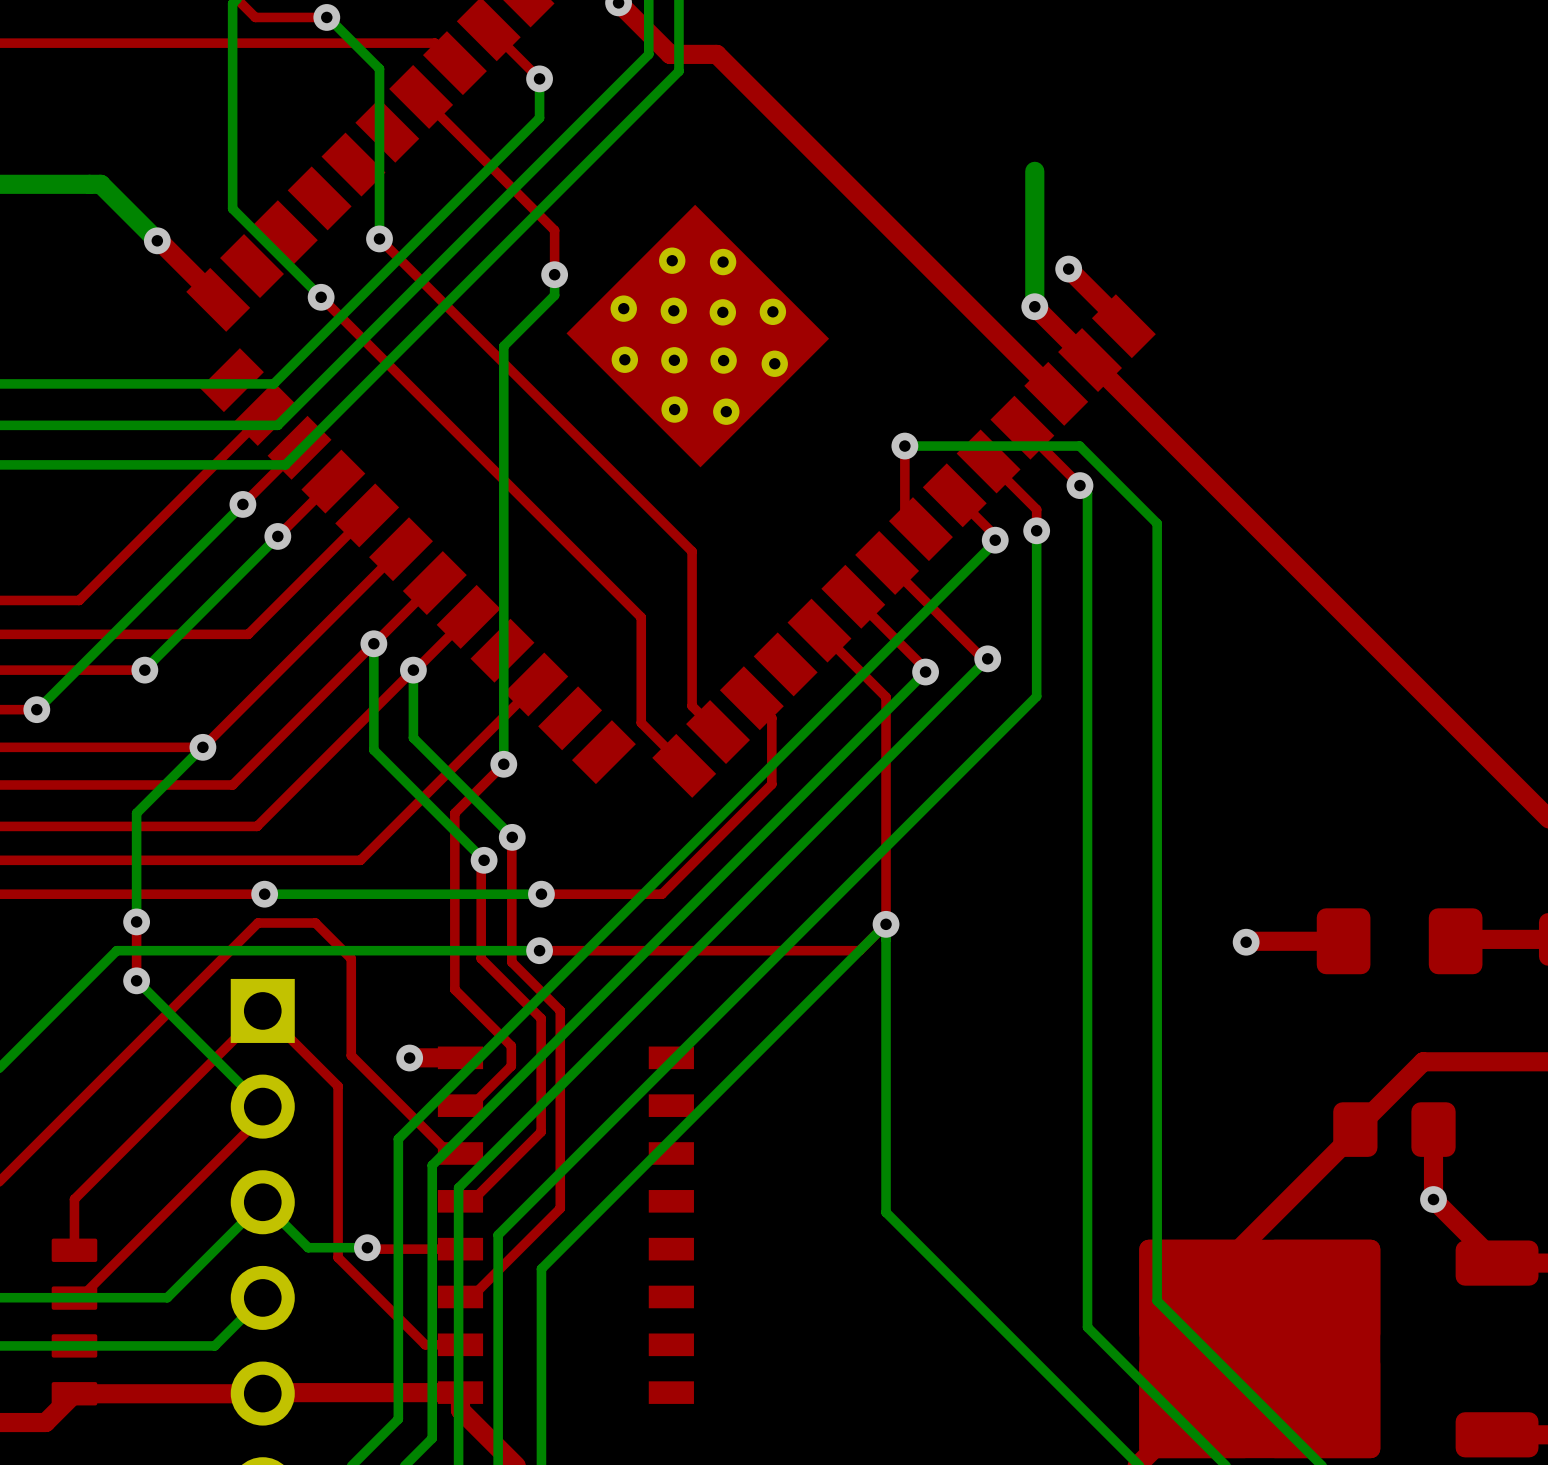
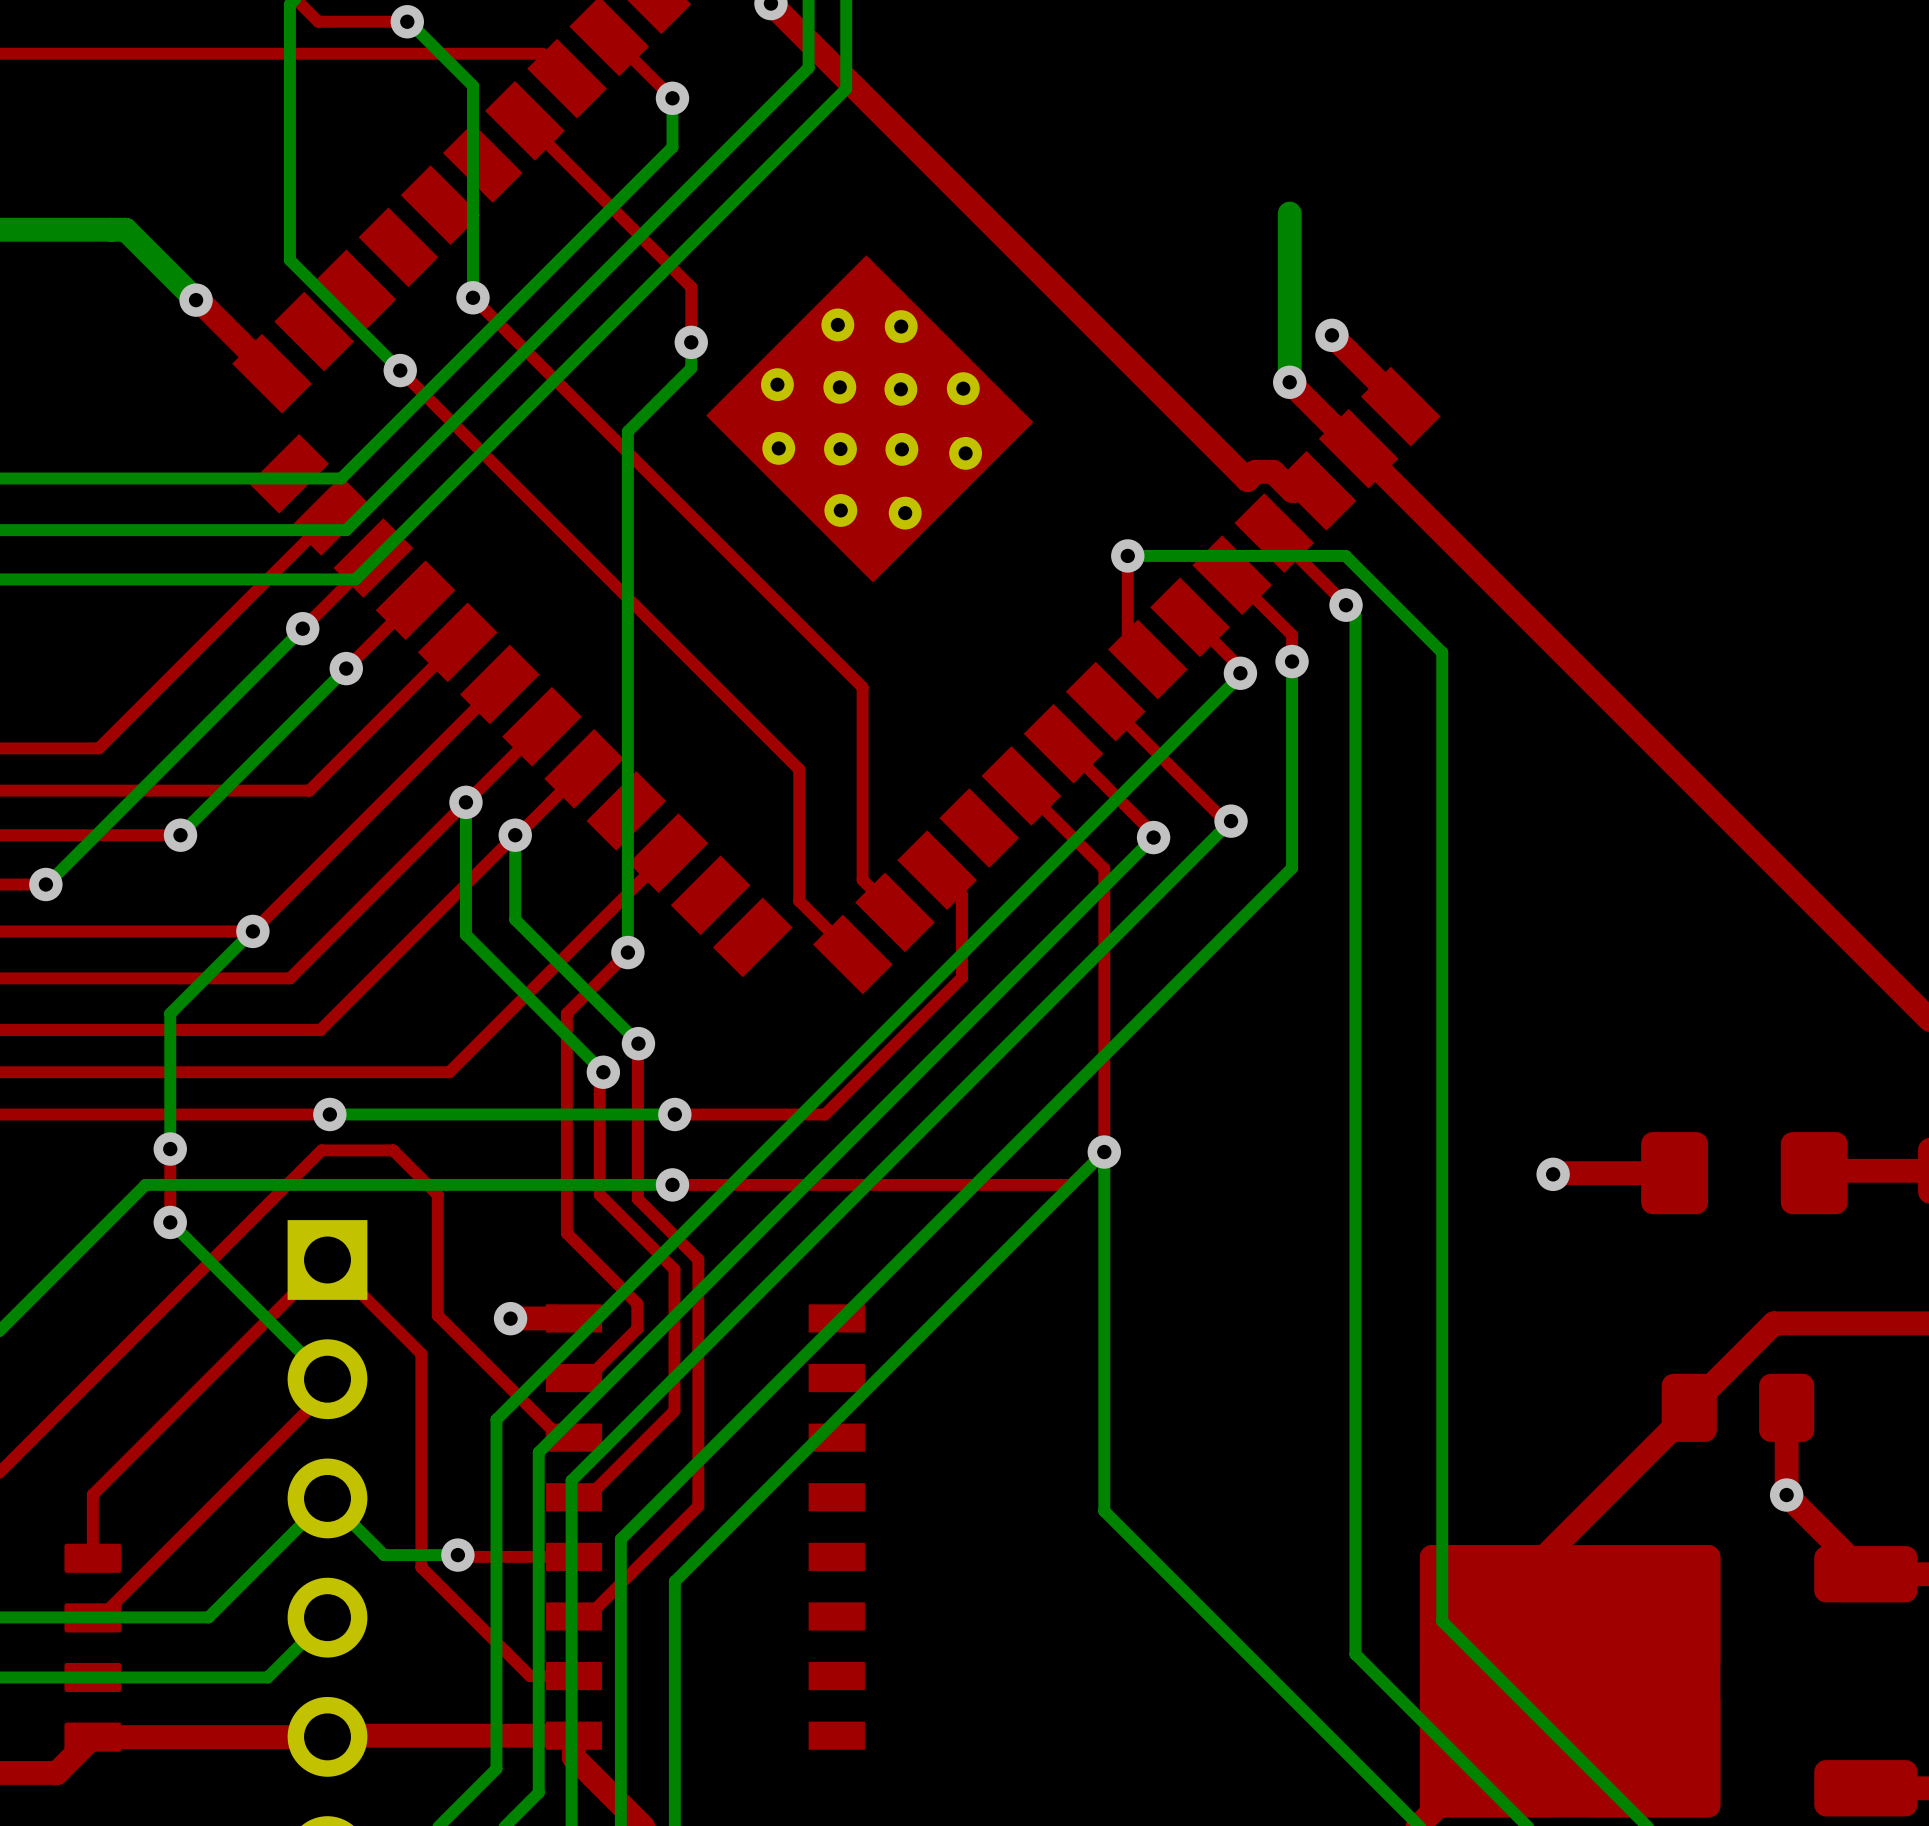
top track: (670, 54) (716, 54) (1056, 393) -> (835, 67) (1247, 479) (1255, 471) (1273, 471) (1292, 490) (1316, 490)

